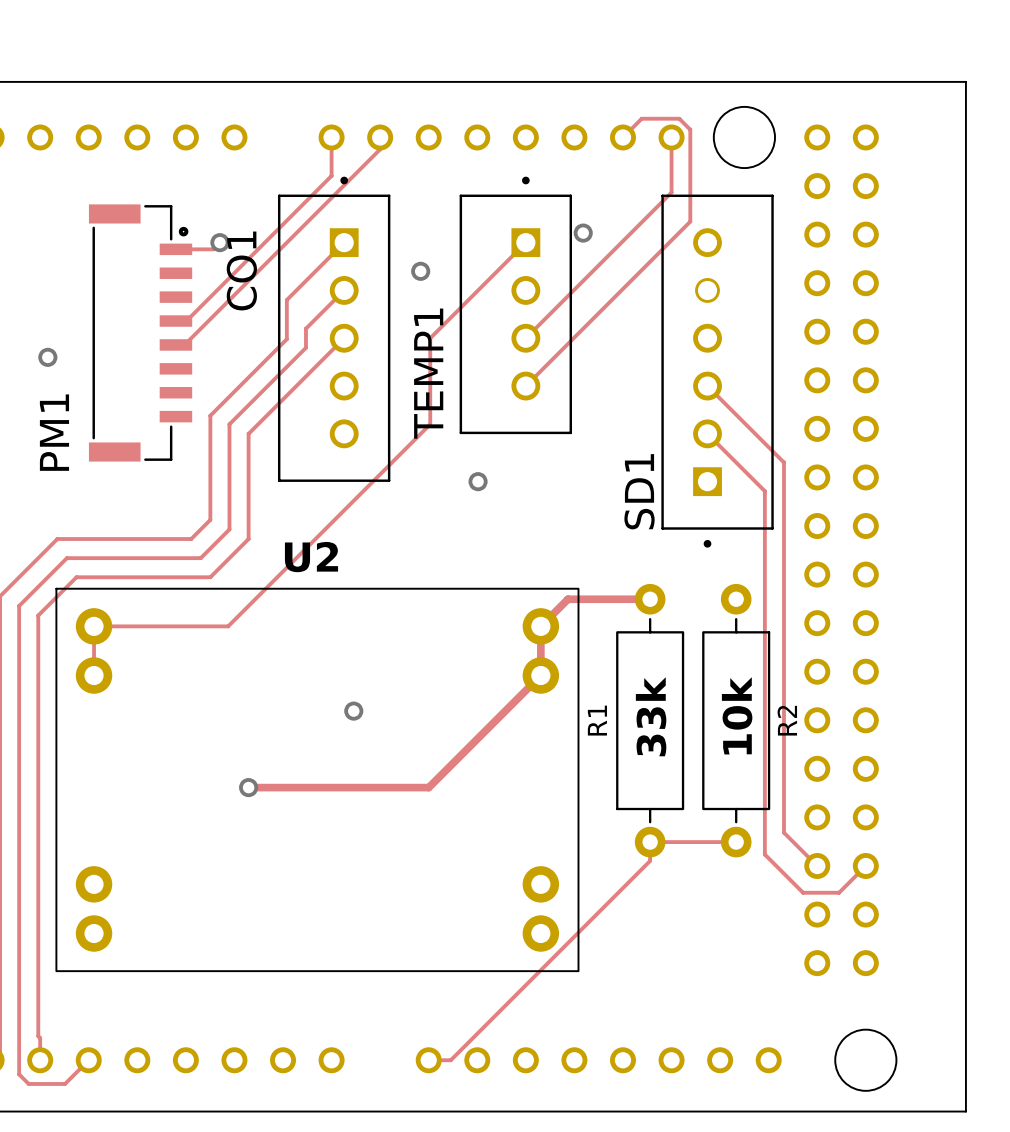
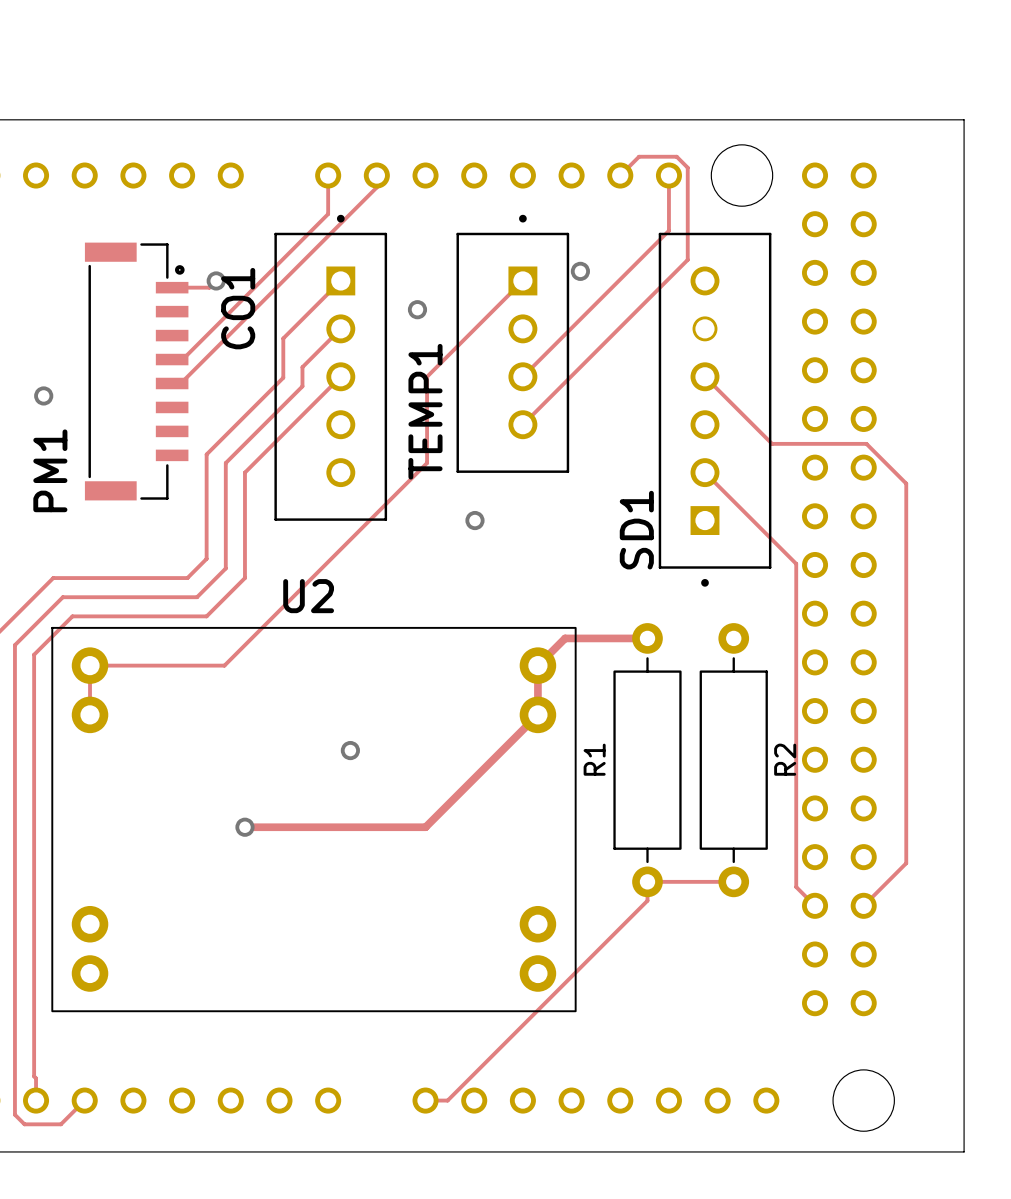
track: none -> (705, 376) (772, 443) (866, 443) (906, 483) (906, 863) (863, 905)
track: (707, 386) (783, 462) (783, 832) (798, 847) -> none
track: (764, 491) (764, 854) (803, 892) (839, 892) (865, 865) -> (762, 530) (796, 563) (796, 887)
text: 10k (737, 715) -> none
text: 33k (651, 716) -> none

